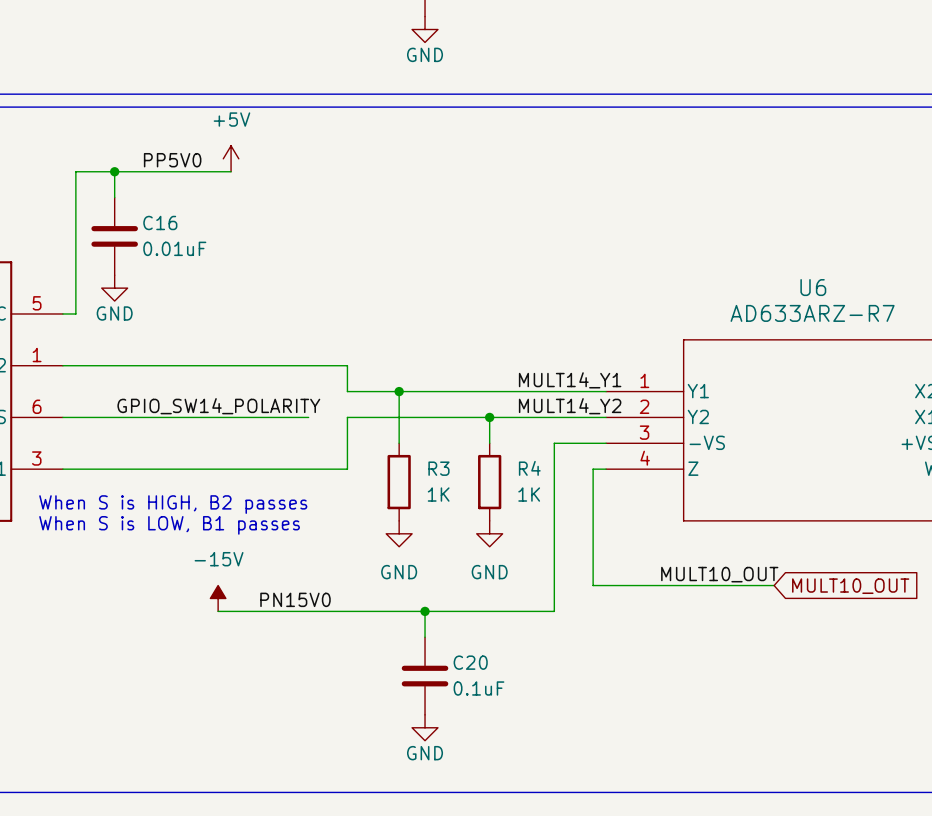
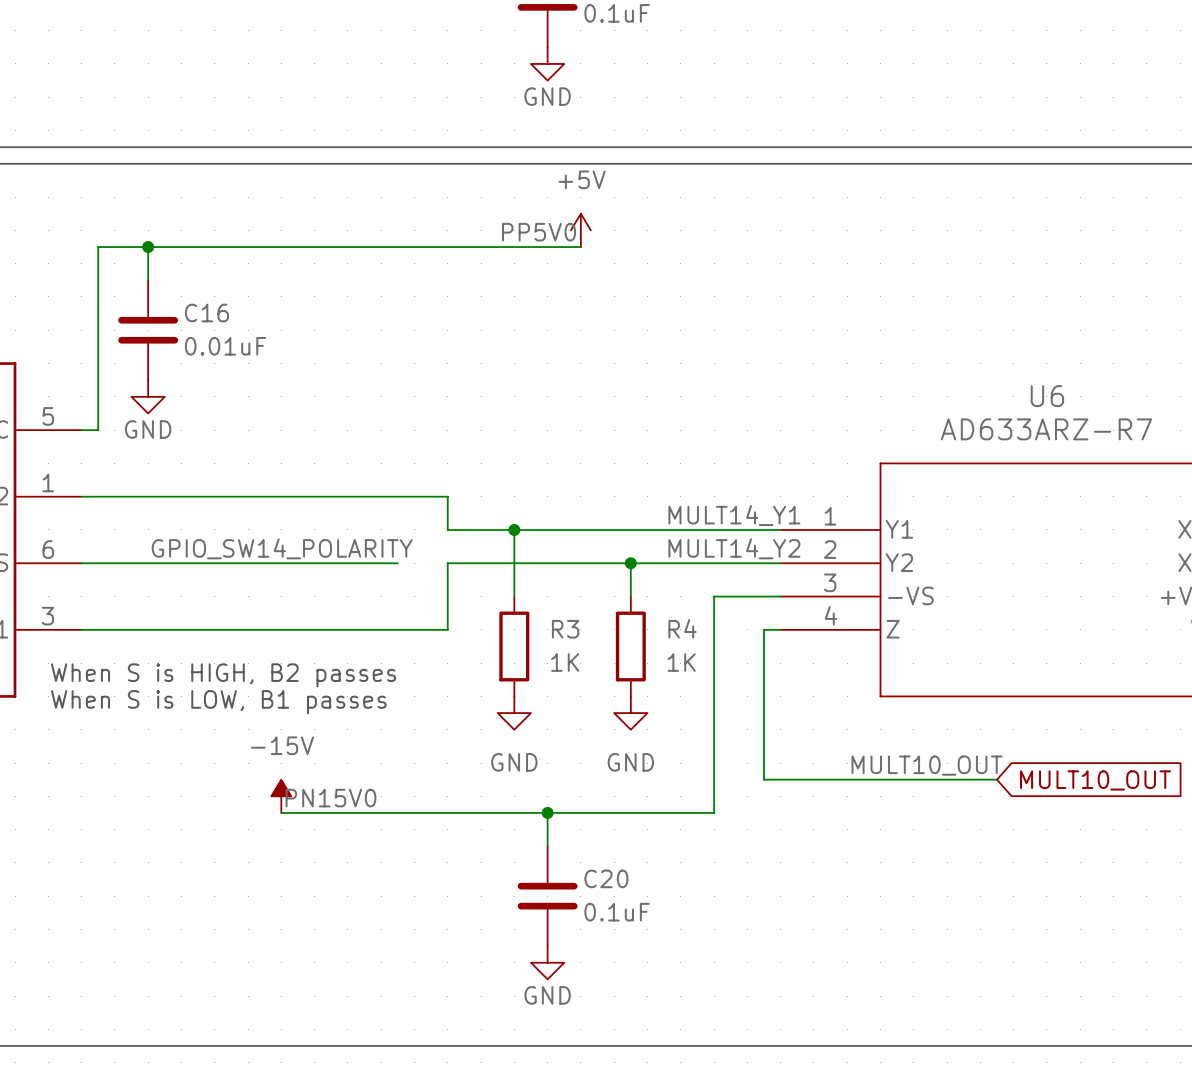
power symbol position: +5V (231, 158) -> +5V (580, 230)
label position: PP5V0 (172, 160) -> PP5V0 (539, 232)
wire: none -> (297, 247) (580, 247)
label position: PN15V0 (295, 599) -> PN15V0 (330, 798)

